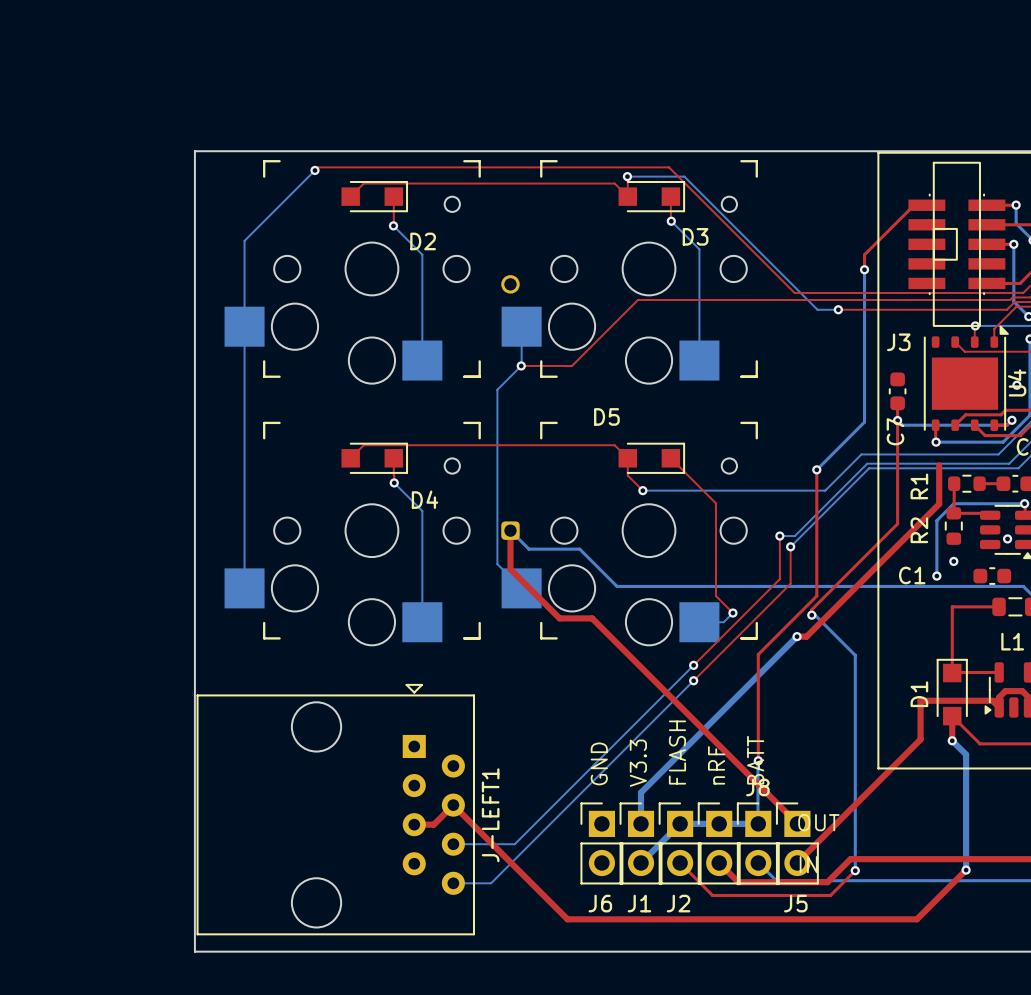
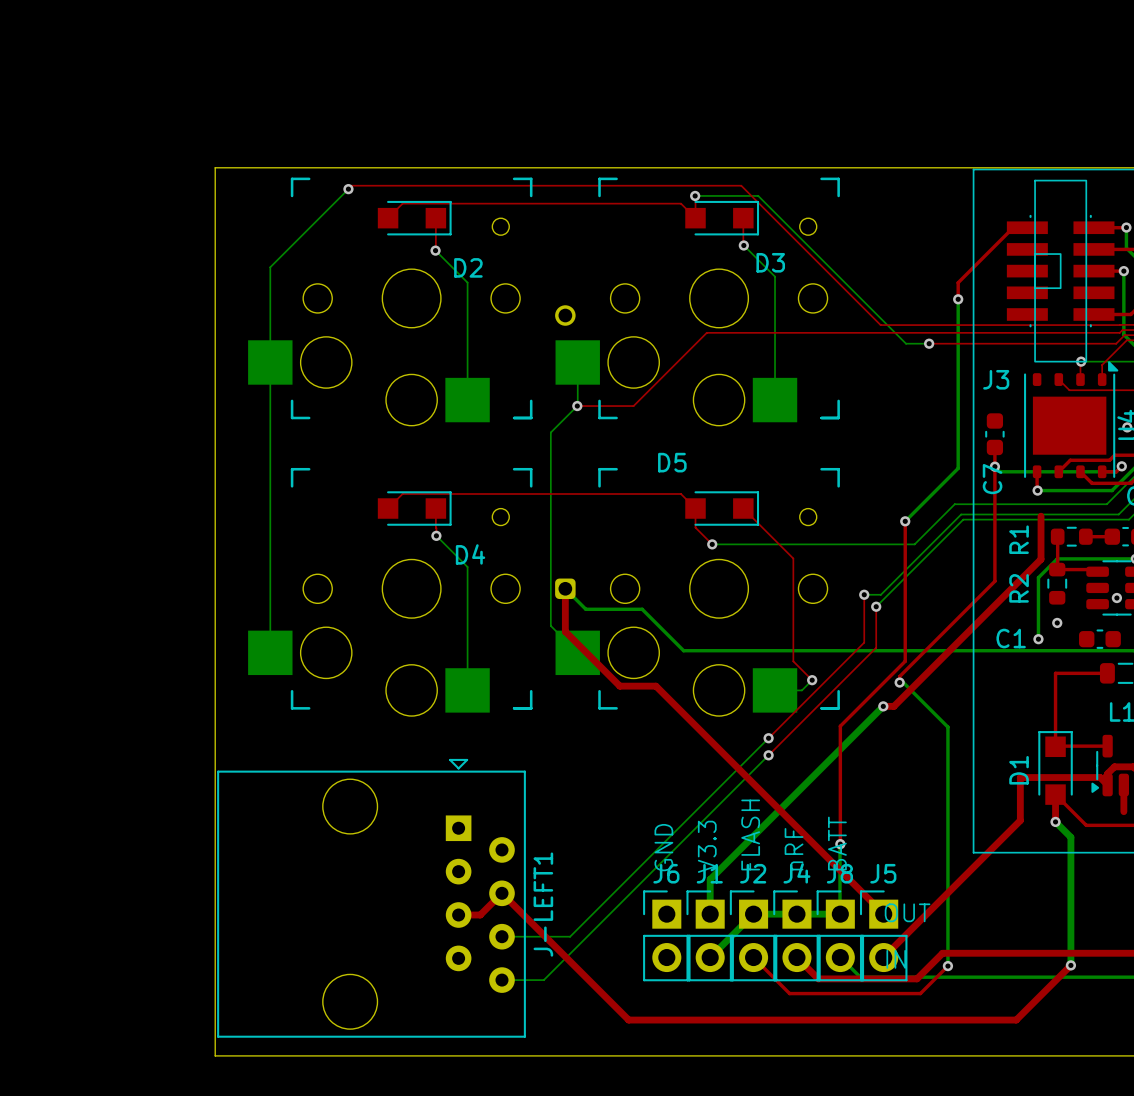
top track: none -> (1123, 784) (1123, 811)
J4 name: none -> J4 (796, 873)
J6 name position: J6 (600, 903) -> J6 (666, 873)
J1 name position: J1 (639, 903) -> J1 (709, 873)
J2 name position: J2 (678, 903) -> J2 (753, 873)
J5 name position: J5 (795, 903) -> J5 (883, 873)

